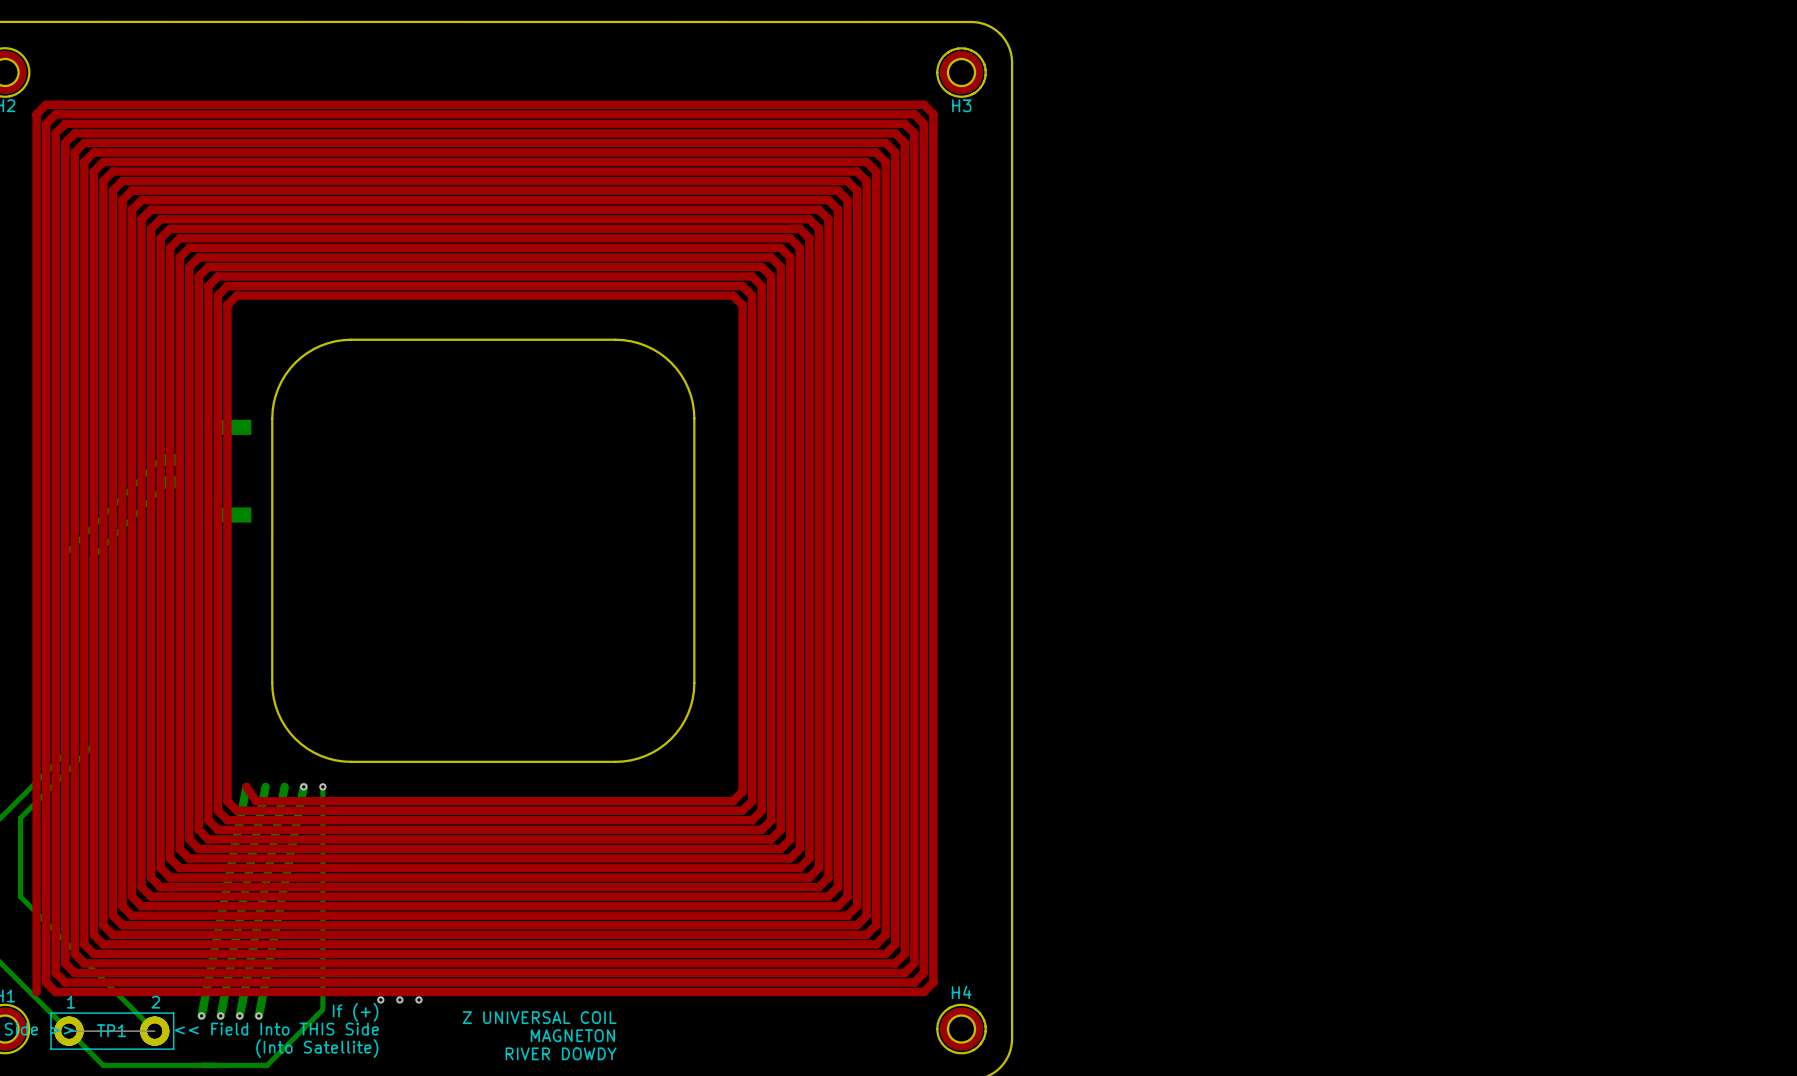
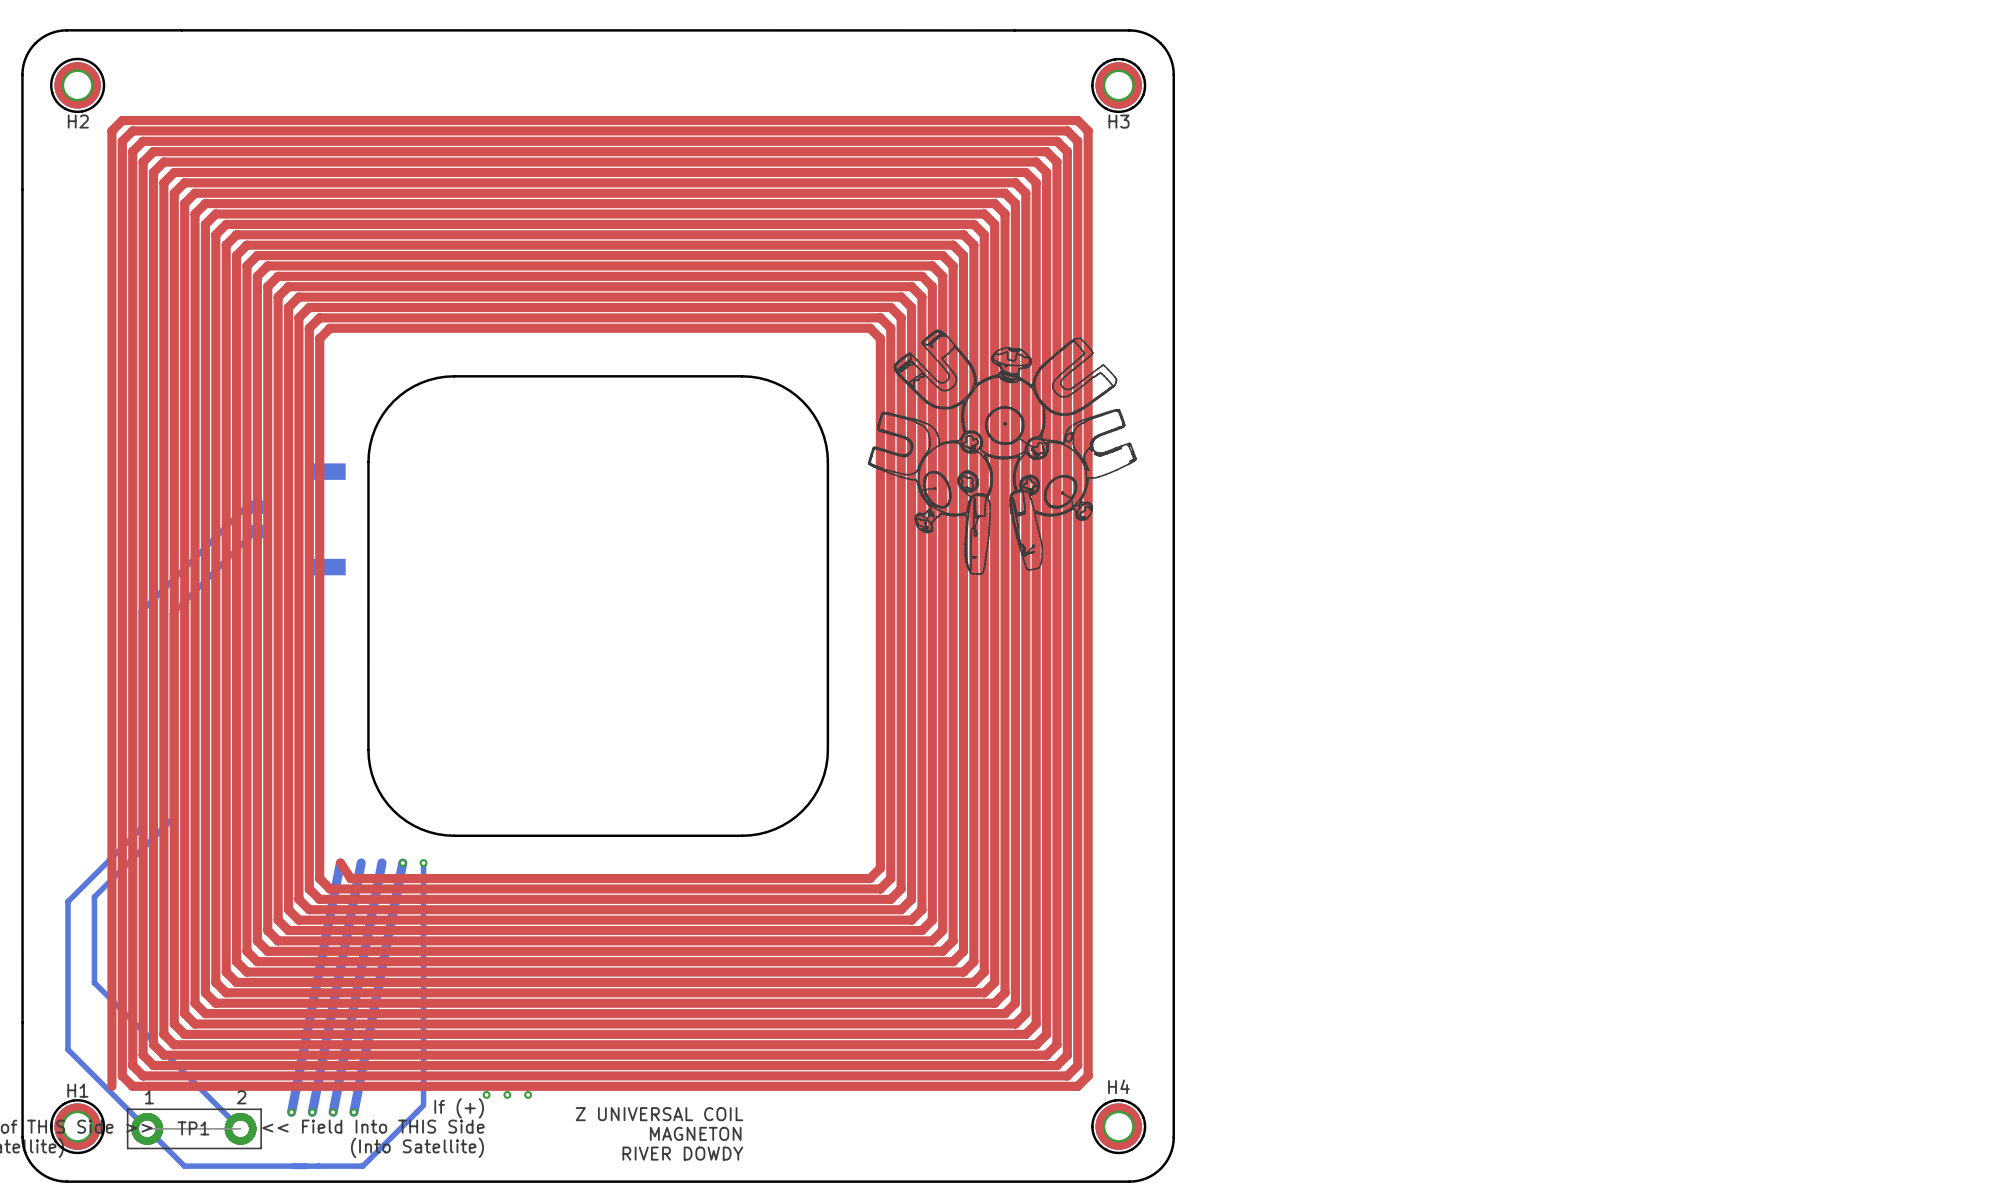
drawing: none -> [868, 330, 1136, 574]

